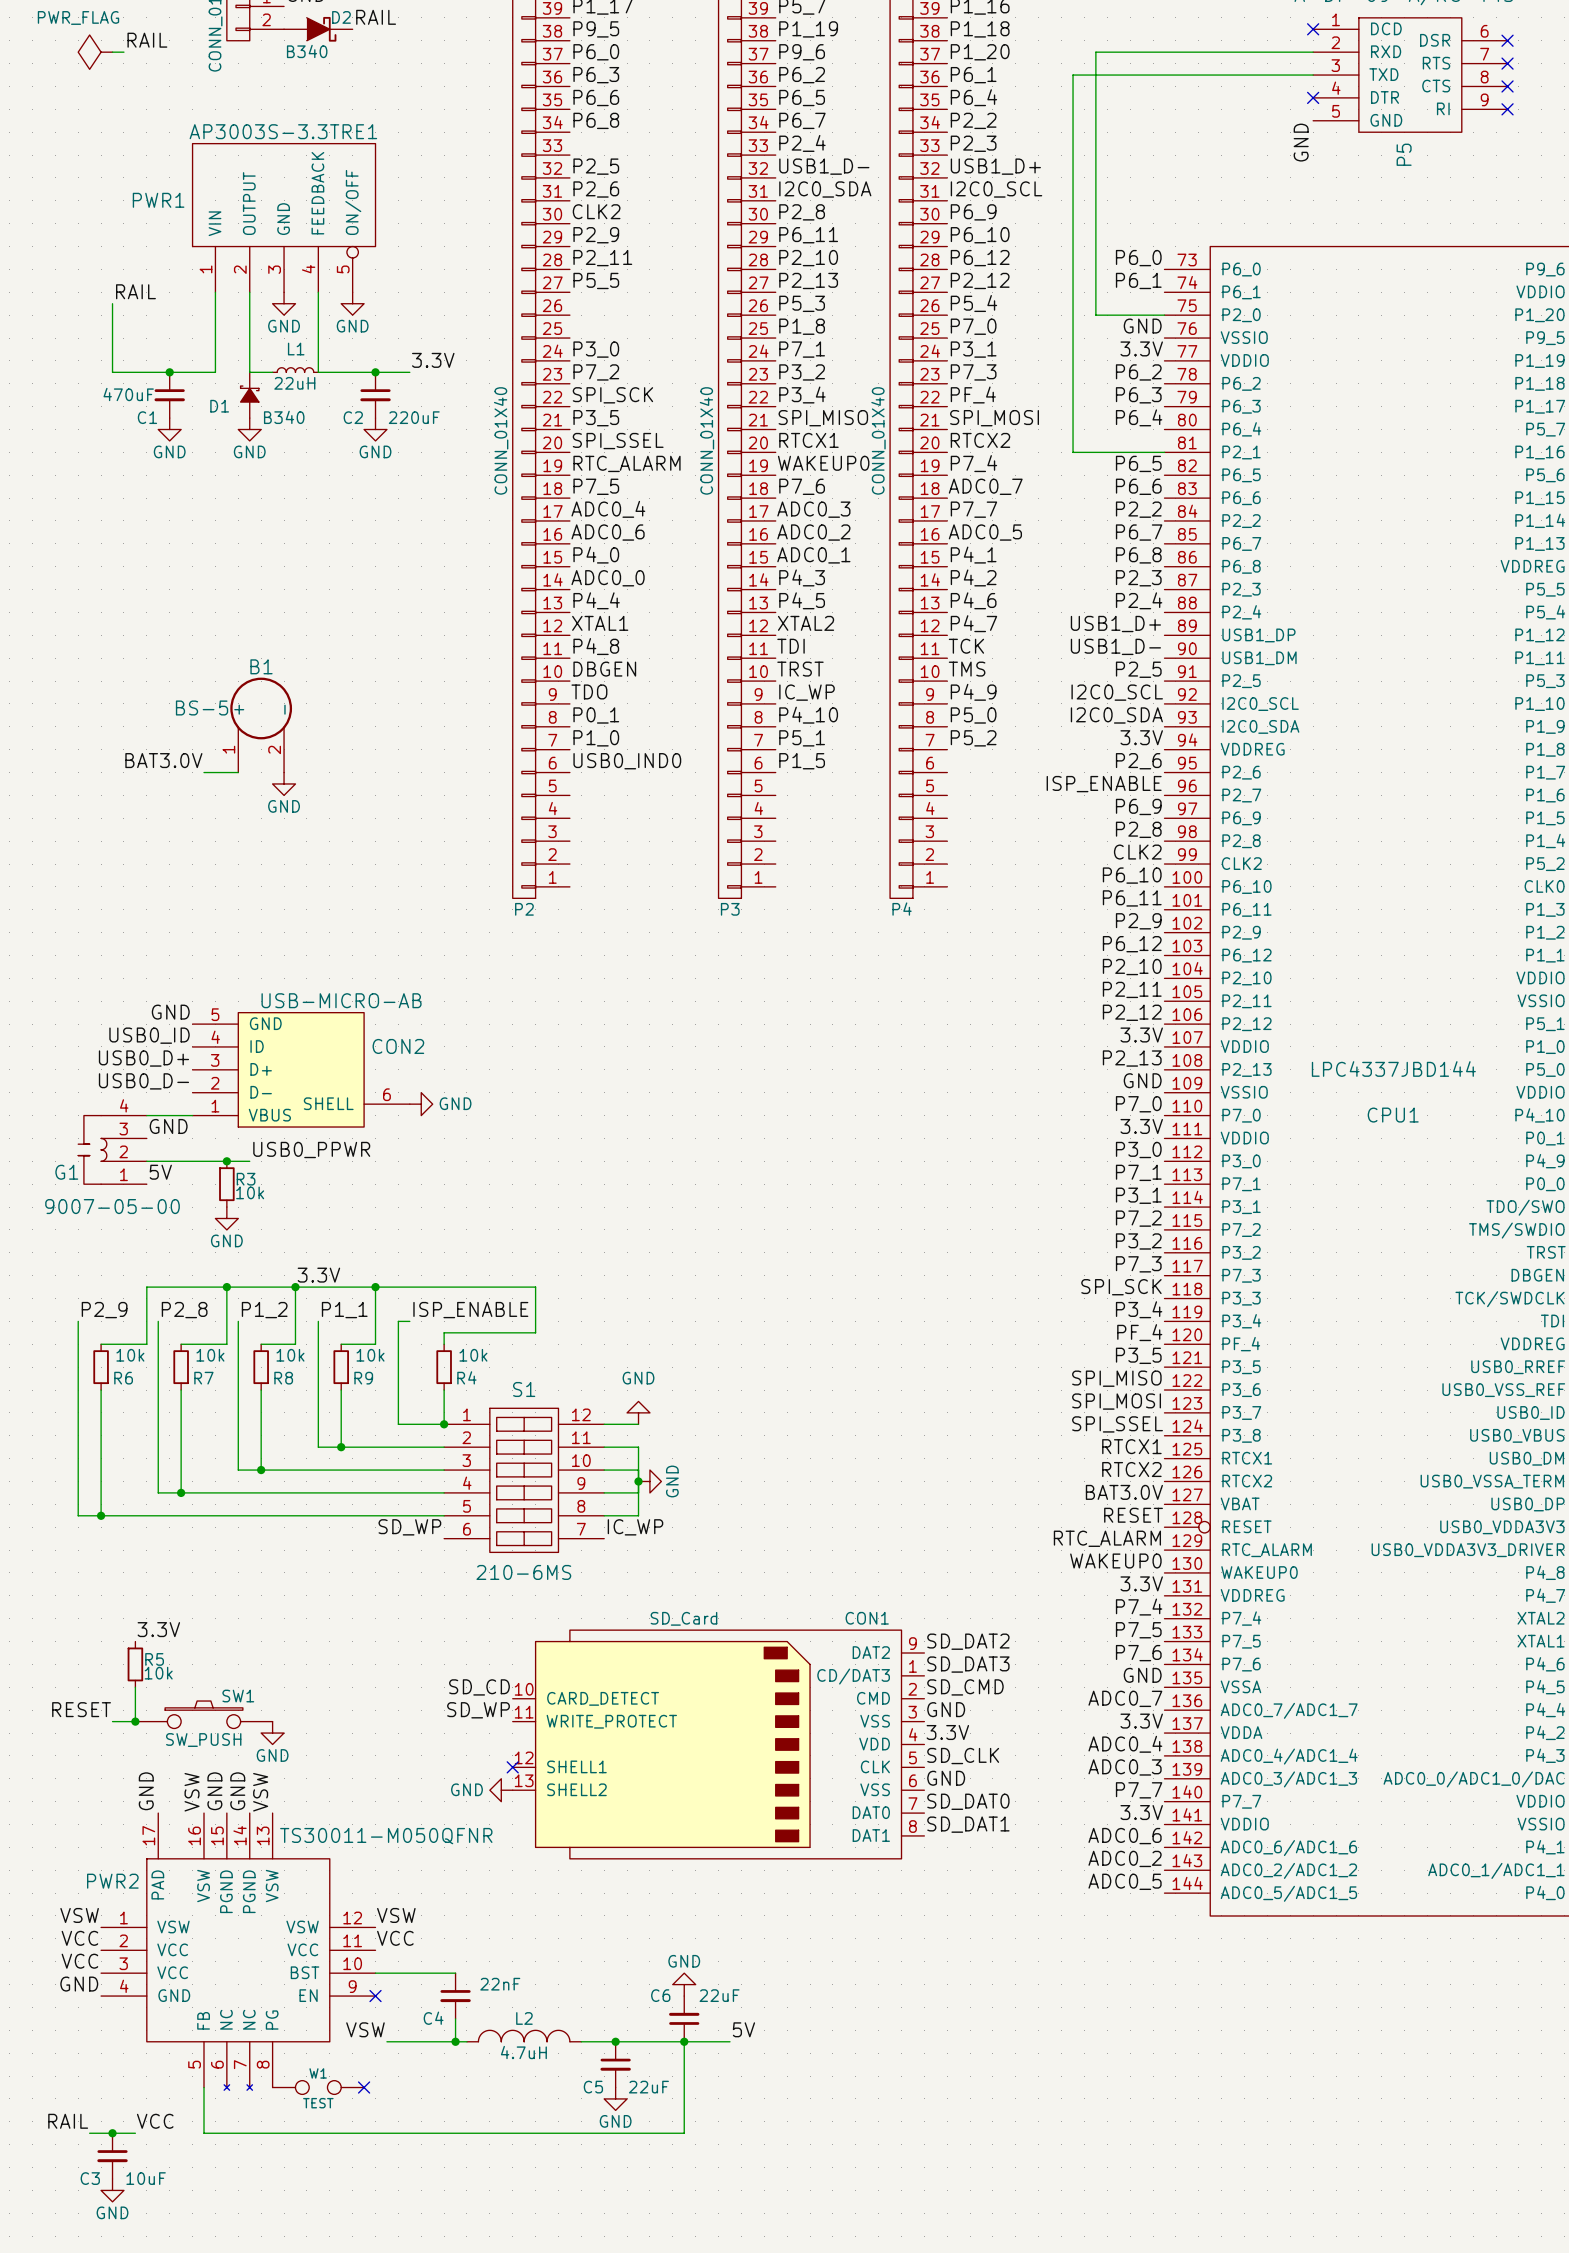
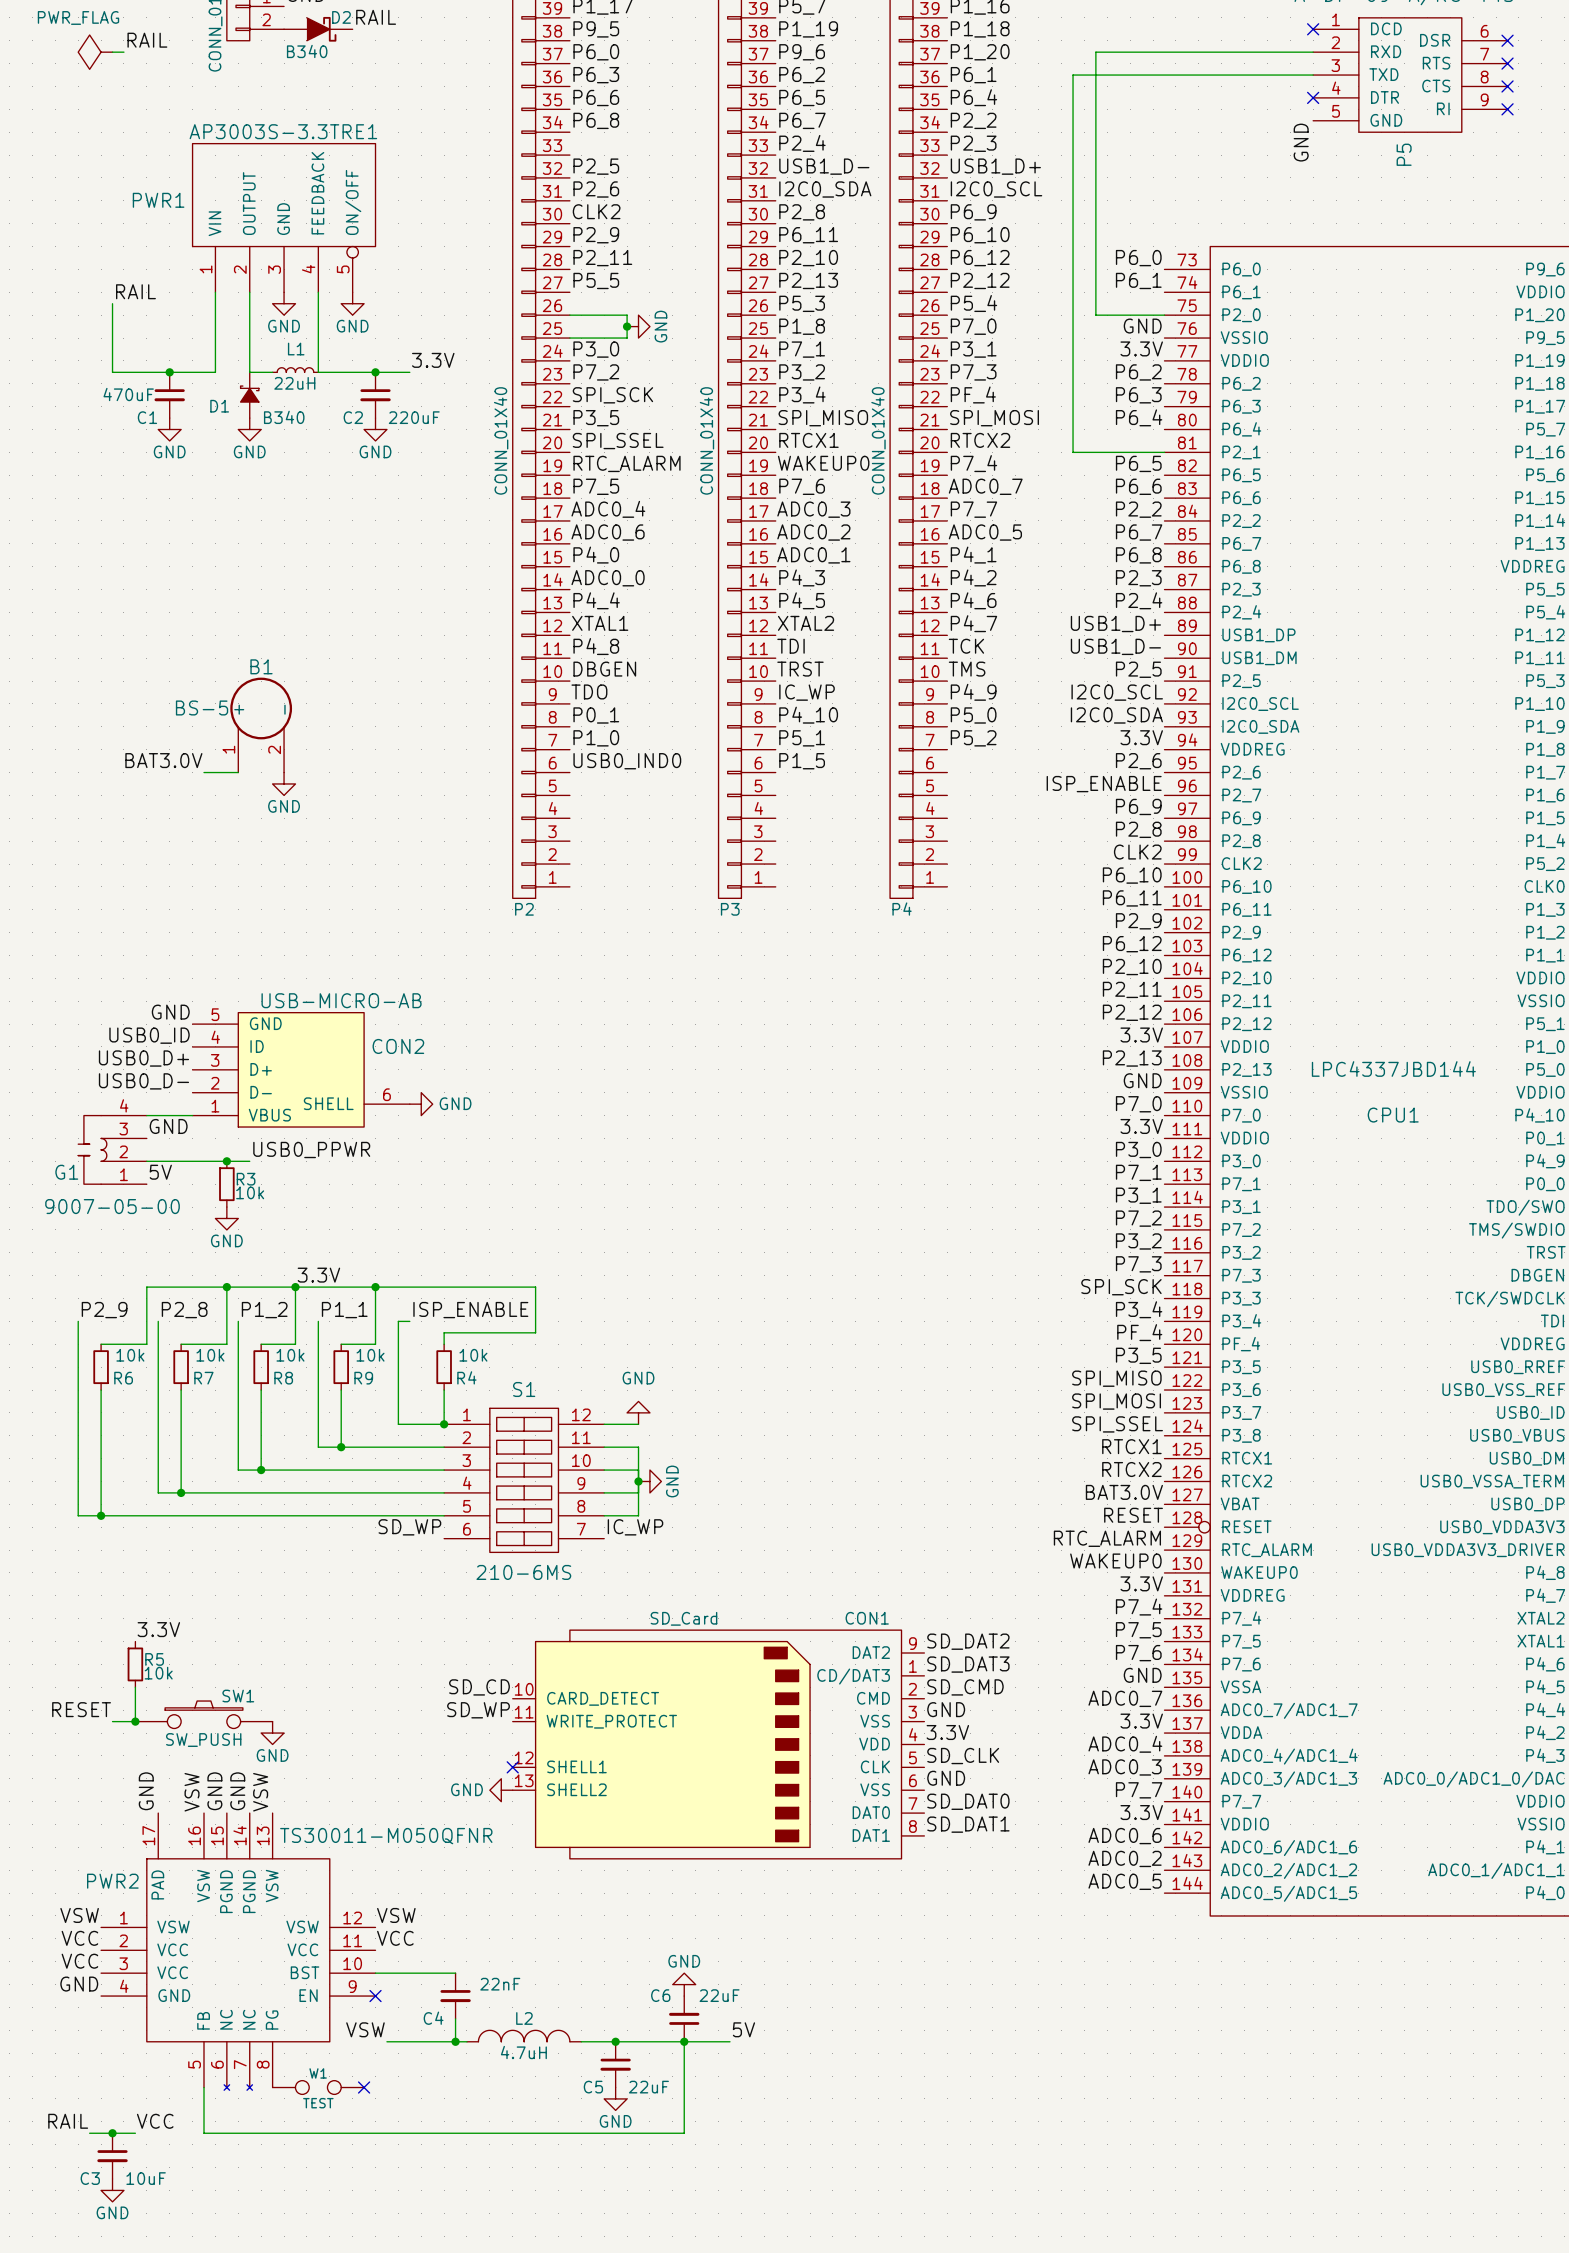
wire: none -> (569, 315) (627, 315) (627, 338) (569, 338)
junction: none -> (627, 326)
power symbol: none -> GND (638, 326)

